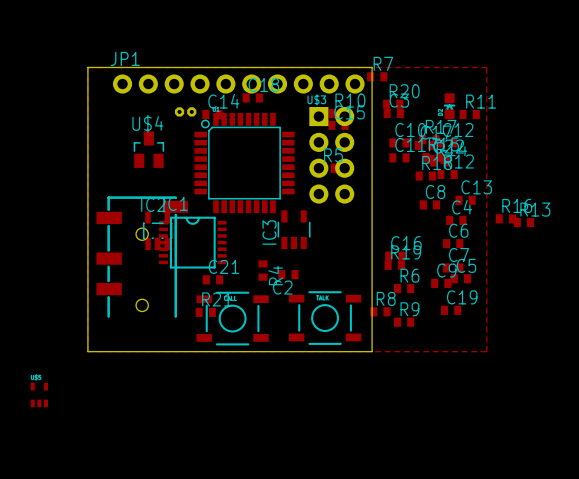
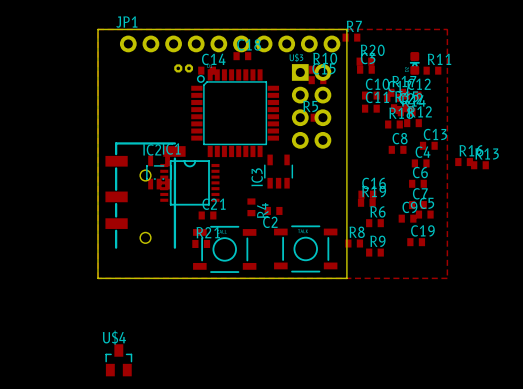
U$4 position: (148, 149) -> (118, 360)
part: (39, 395) -> none

